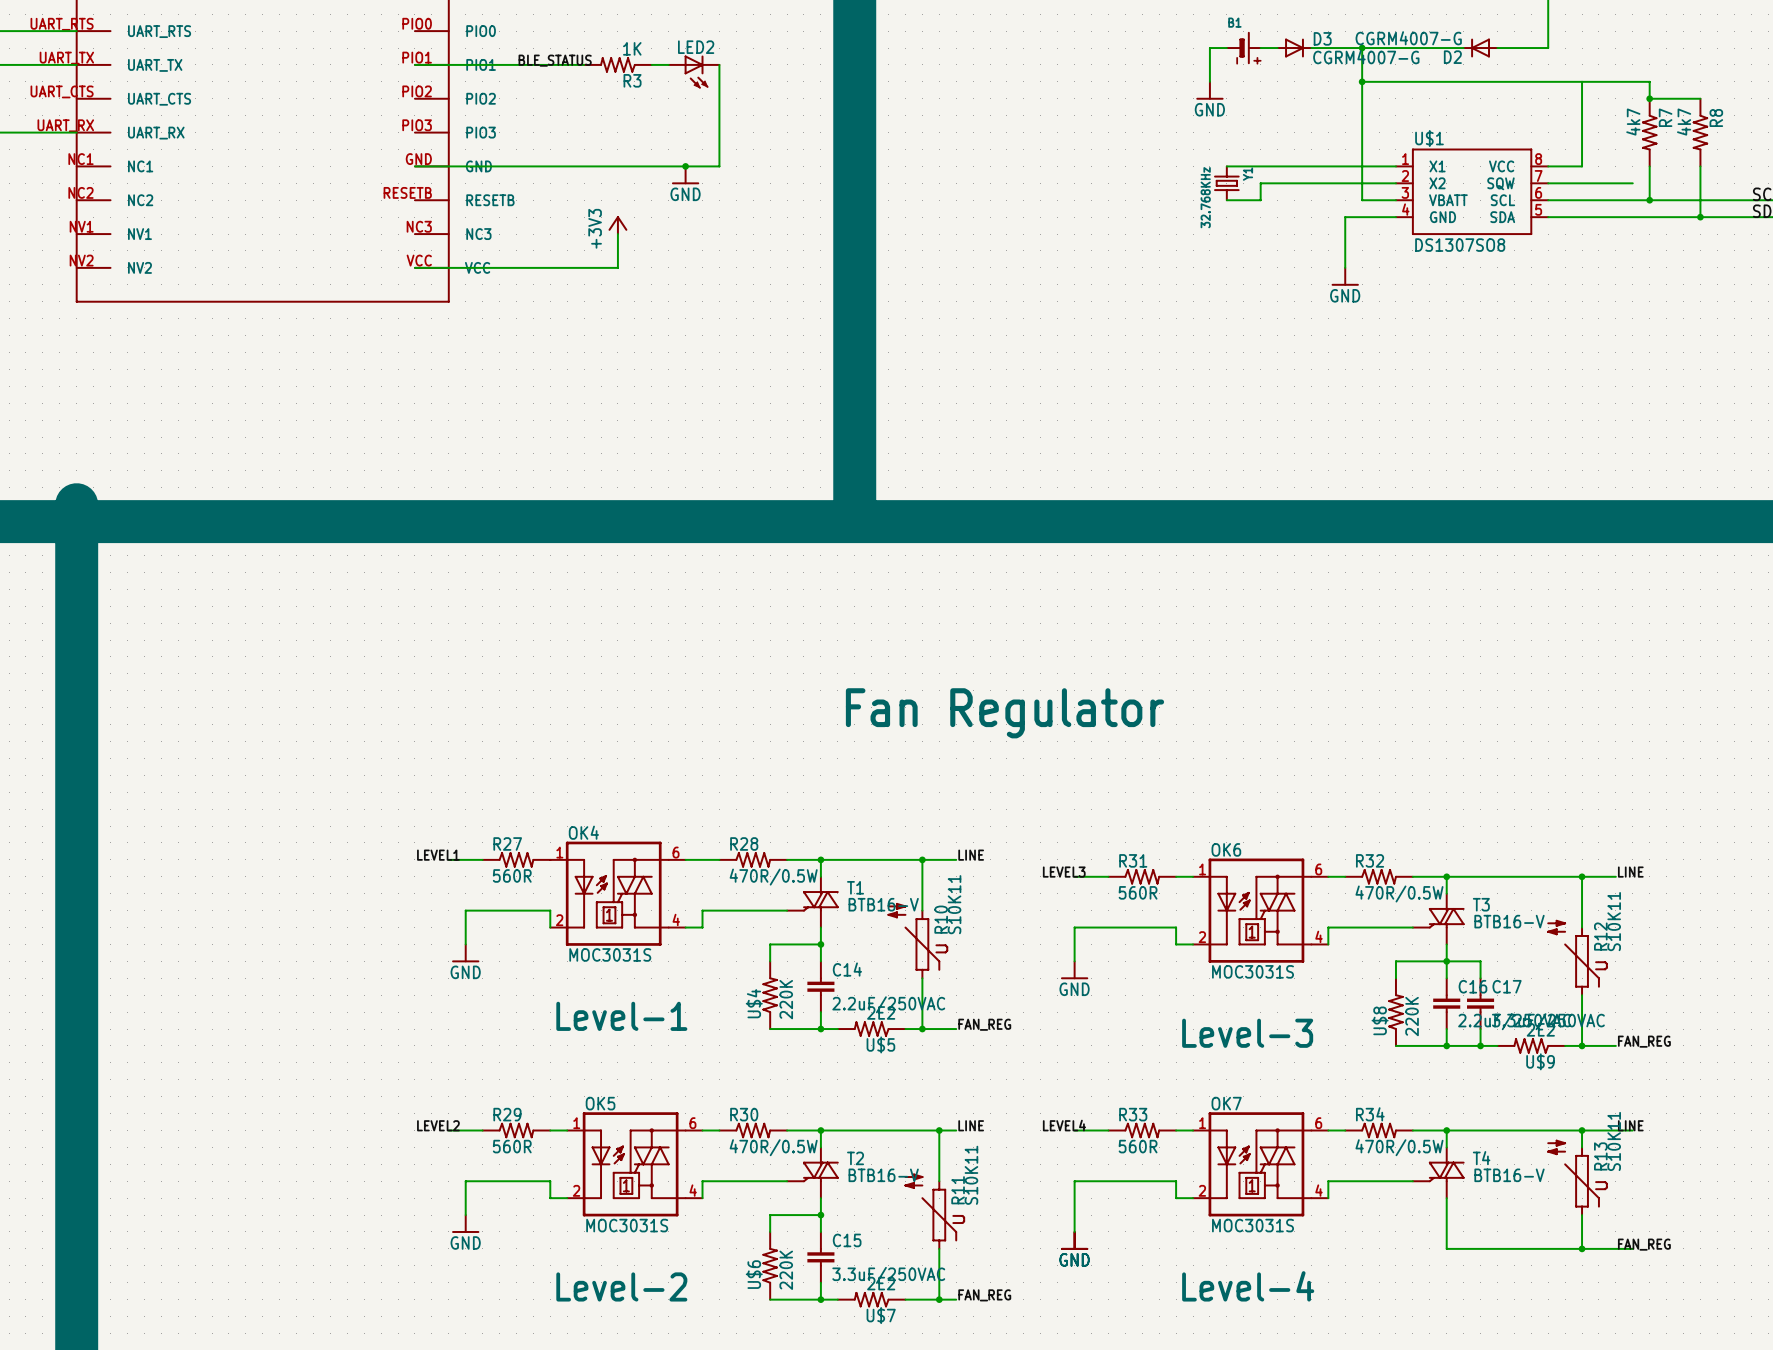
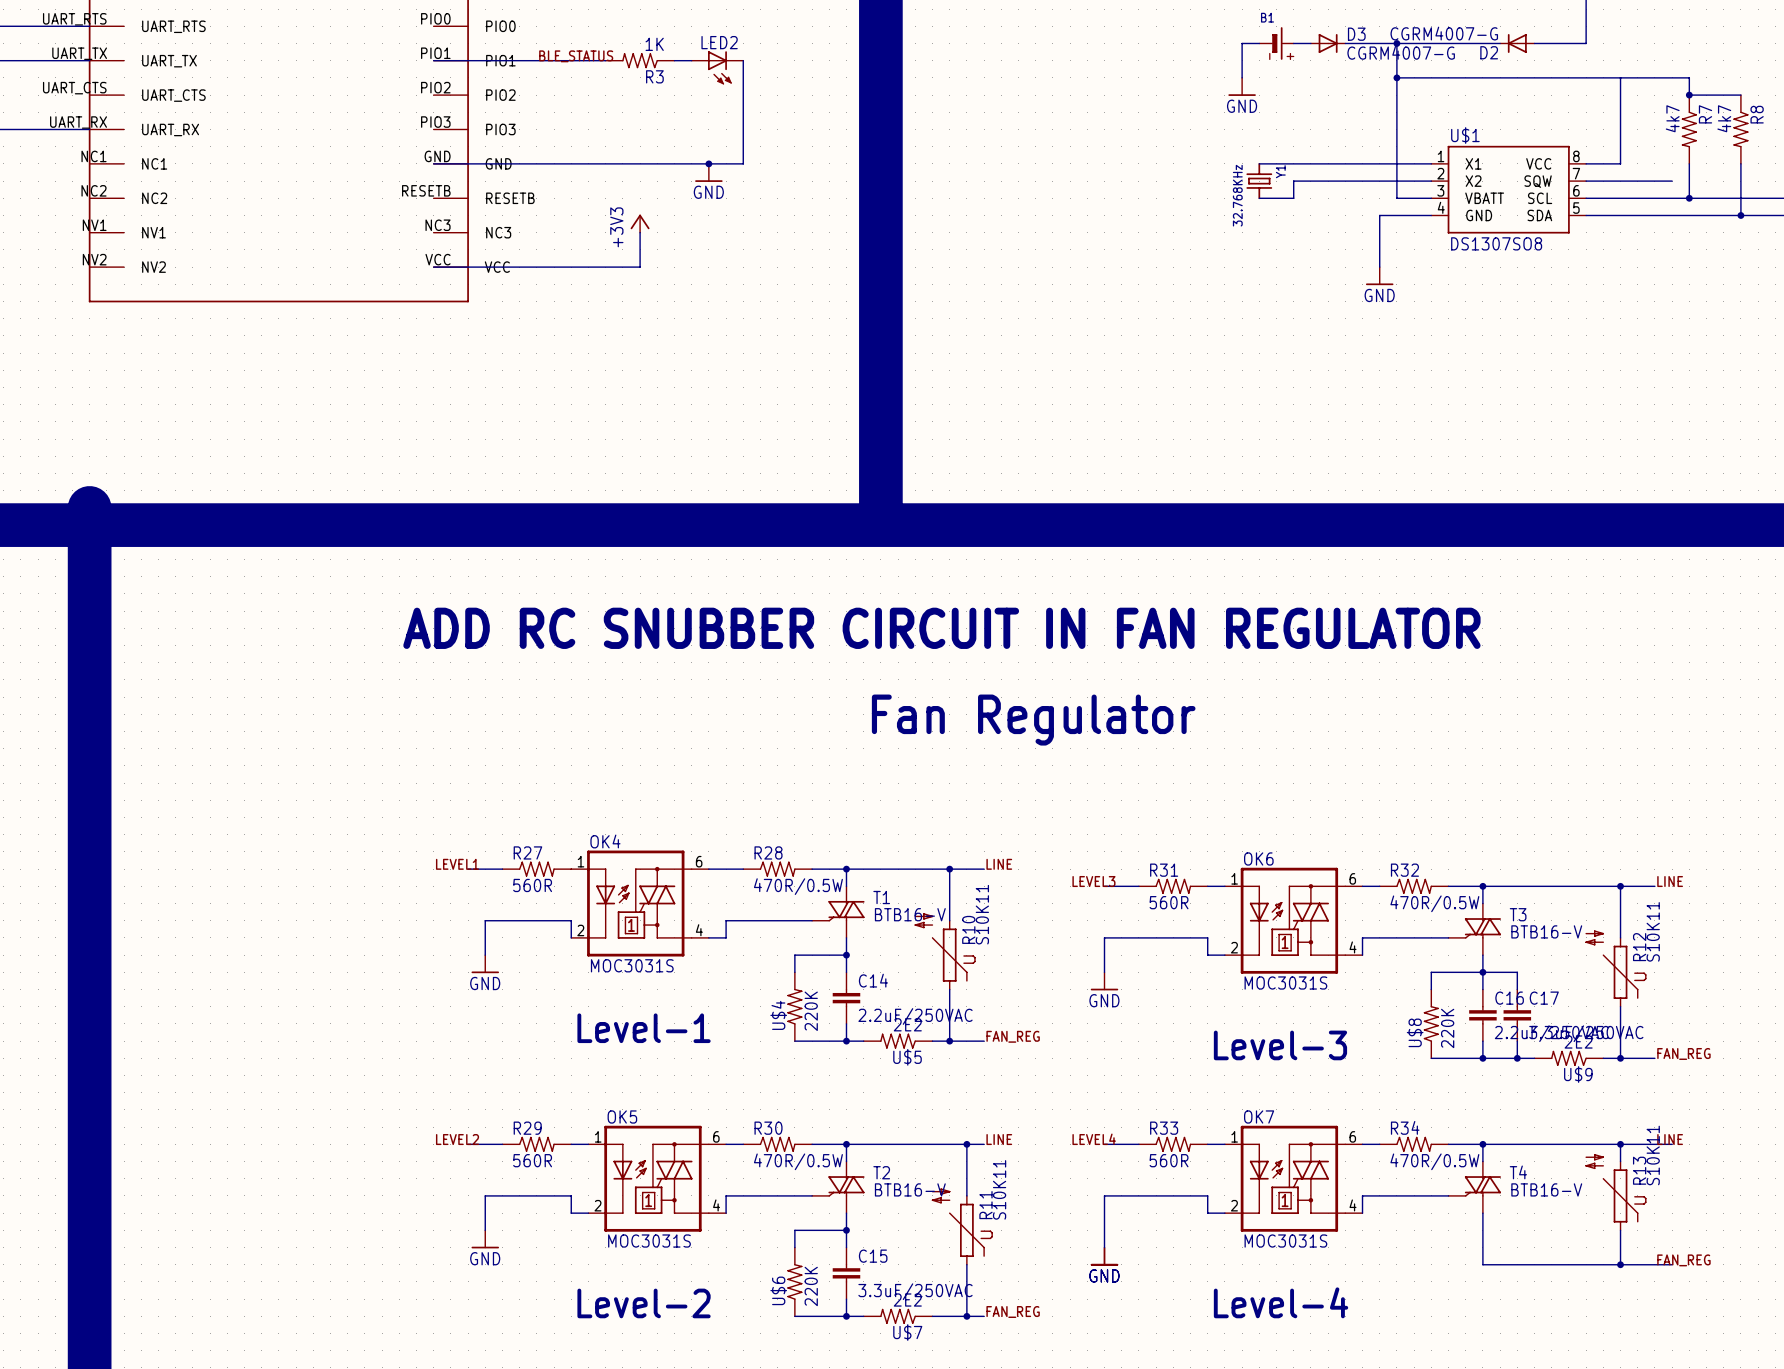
text: none -> ADD RC SNUBBER CIRCUIT IN FAN REGULATOR (941, 628)

